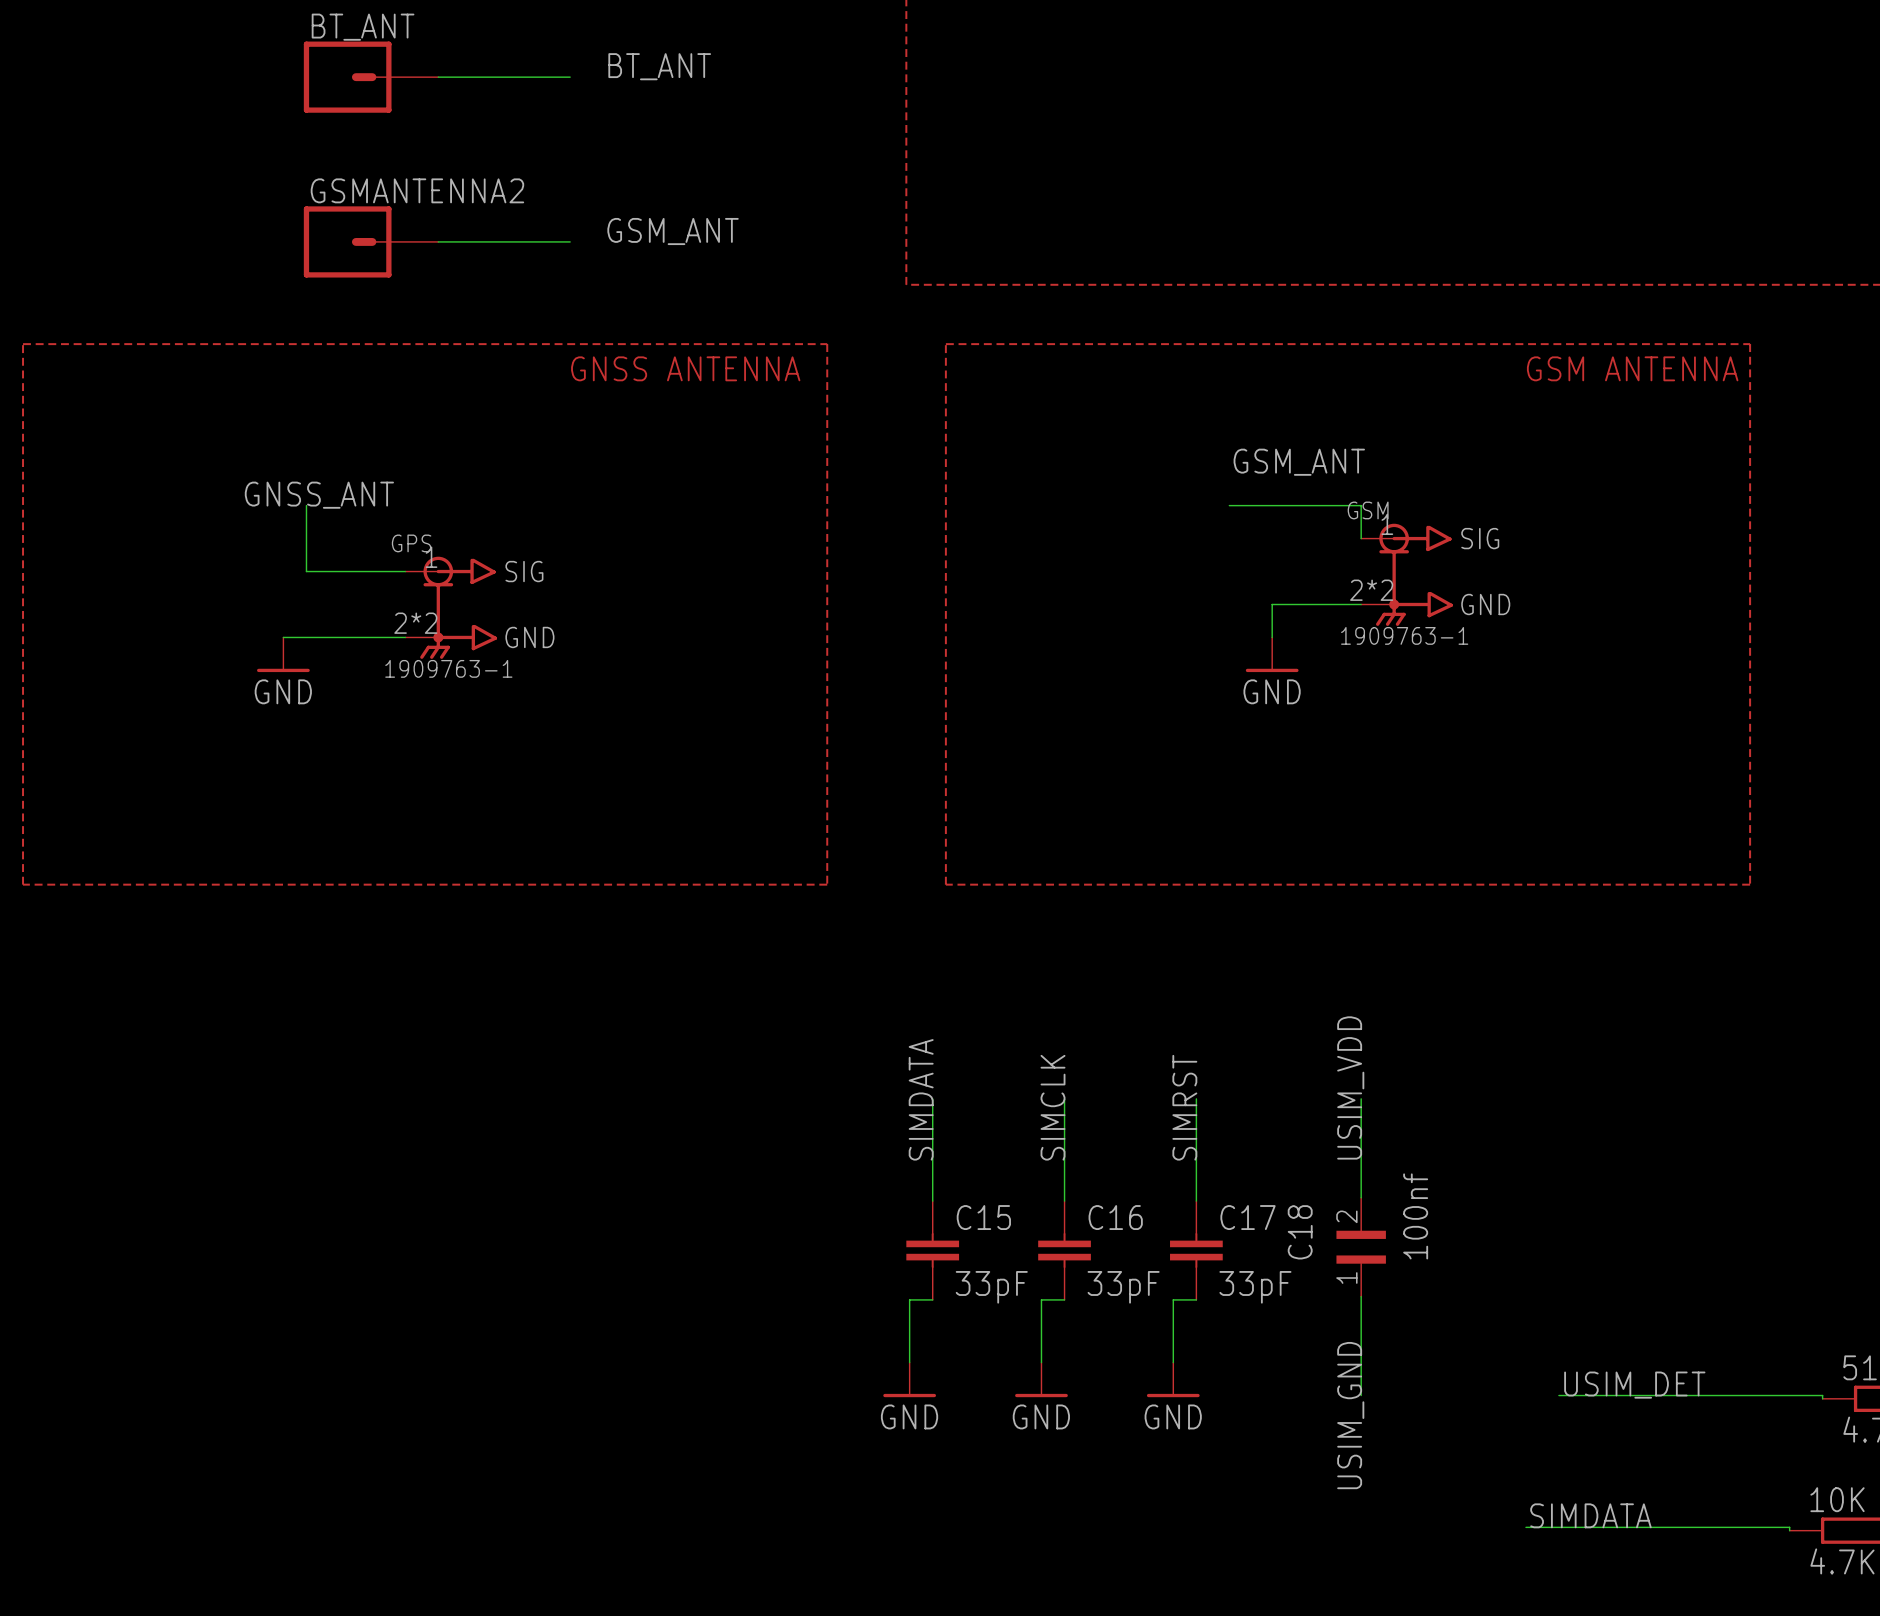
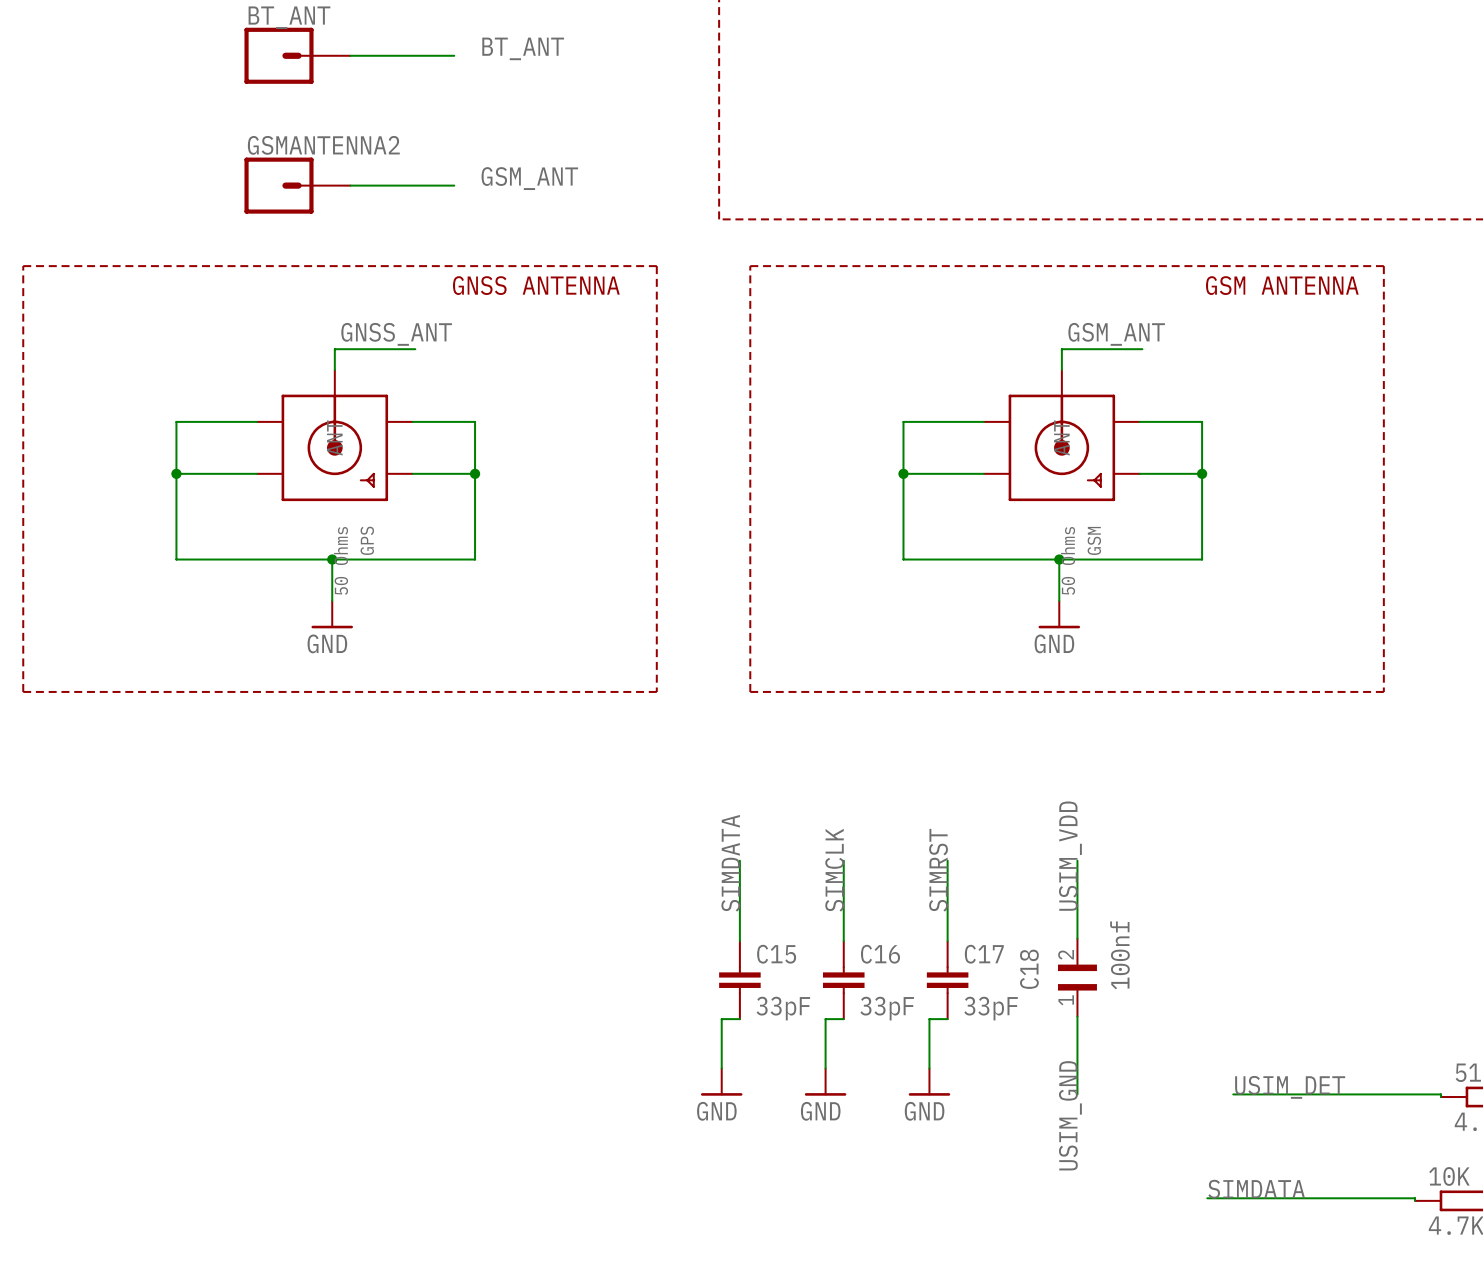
wire: none -> (415, 349) (334, 349) (334, 369)
wire: none -> (1142, 349) (1061, 349) (1061, 369)
label position: GSM_ANT (1299, 462) -> GSM_ANT (1116, 334)
label position: GNSS_ANT (319, 495) -> GNSS_ANT (396, 334)
wire: (306, 505) (306, 571) (405, 571) -> none
wire: (1229, 505) (1361, 505) (1361, 538) -> none
wire: none -> (256, 421) (176, 421) (176, 559) (475, 559) (475, 421) (412, 421)
wire: none -> (983, 421) (903, 421) (903, 559) (1202, 559) (1202, 421) (1139, 421)
GPS: none -> 50 Ohms (334, 435)
GSM: none -> 50 Ohms (1061, 435)
GSM: 1909763-1 (1407, 574) -> none
wire: (1361, 604) (1272, 604) (1272, 637) -> none
wire: none -> (176, 473) (256, 473)
junction: none -> (176, 473)
GPS: 1909763-1 (451, 607) -> none
wire: none -> (412, 473) (475, 473)
junction: none -> (475, 473)
wire: none -> (903, 473) (983, 473)
junction: none -> (903, 473)
wire: none -> (1139, 473) (1202, 473)
junction: none -> (1202, 473)
wire: (283, 637) (405, 637) -> none
power symbol position: GND (283, 654) -> GND (332, 614)
power symbol position: GND (1272, 654) -> GND (1059, 614)
wire: none -> (332, 559) (332, 601)
junction: none -> (332, 559)
wire: none -> (1059, 559) (1059, 601)
junction: none -> (1059, 559)

